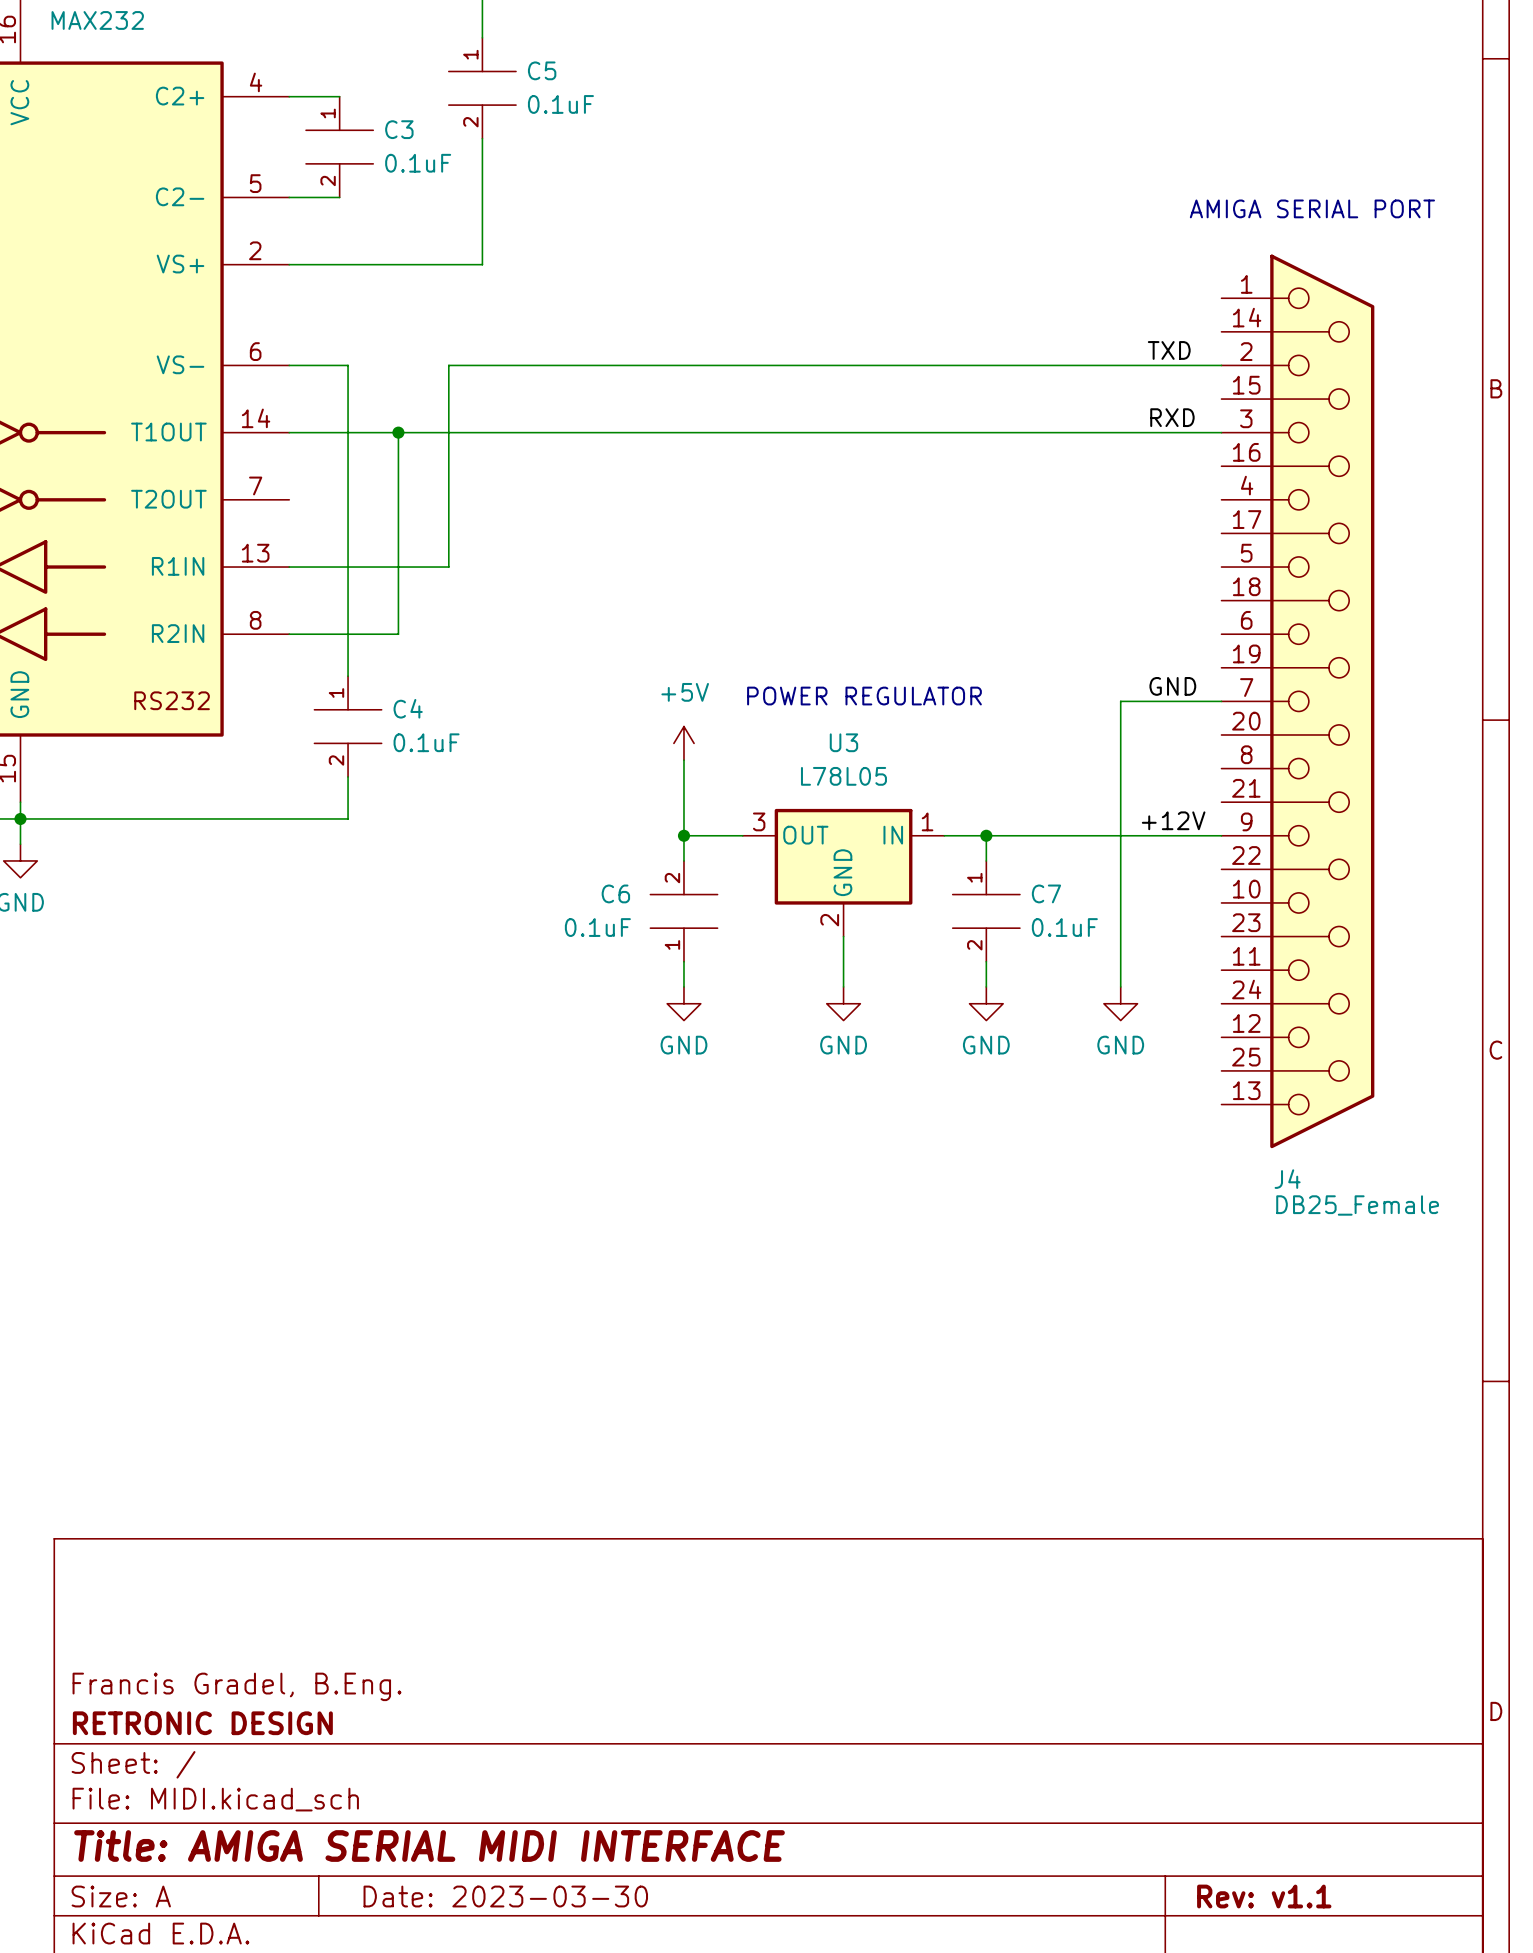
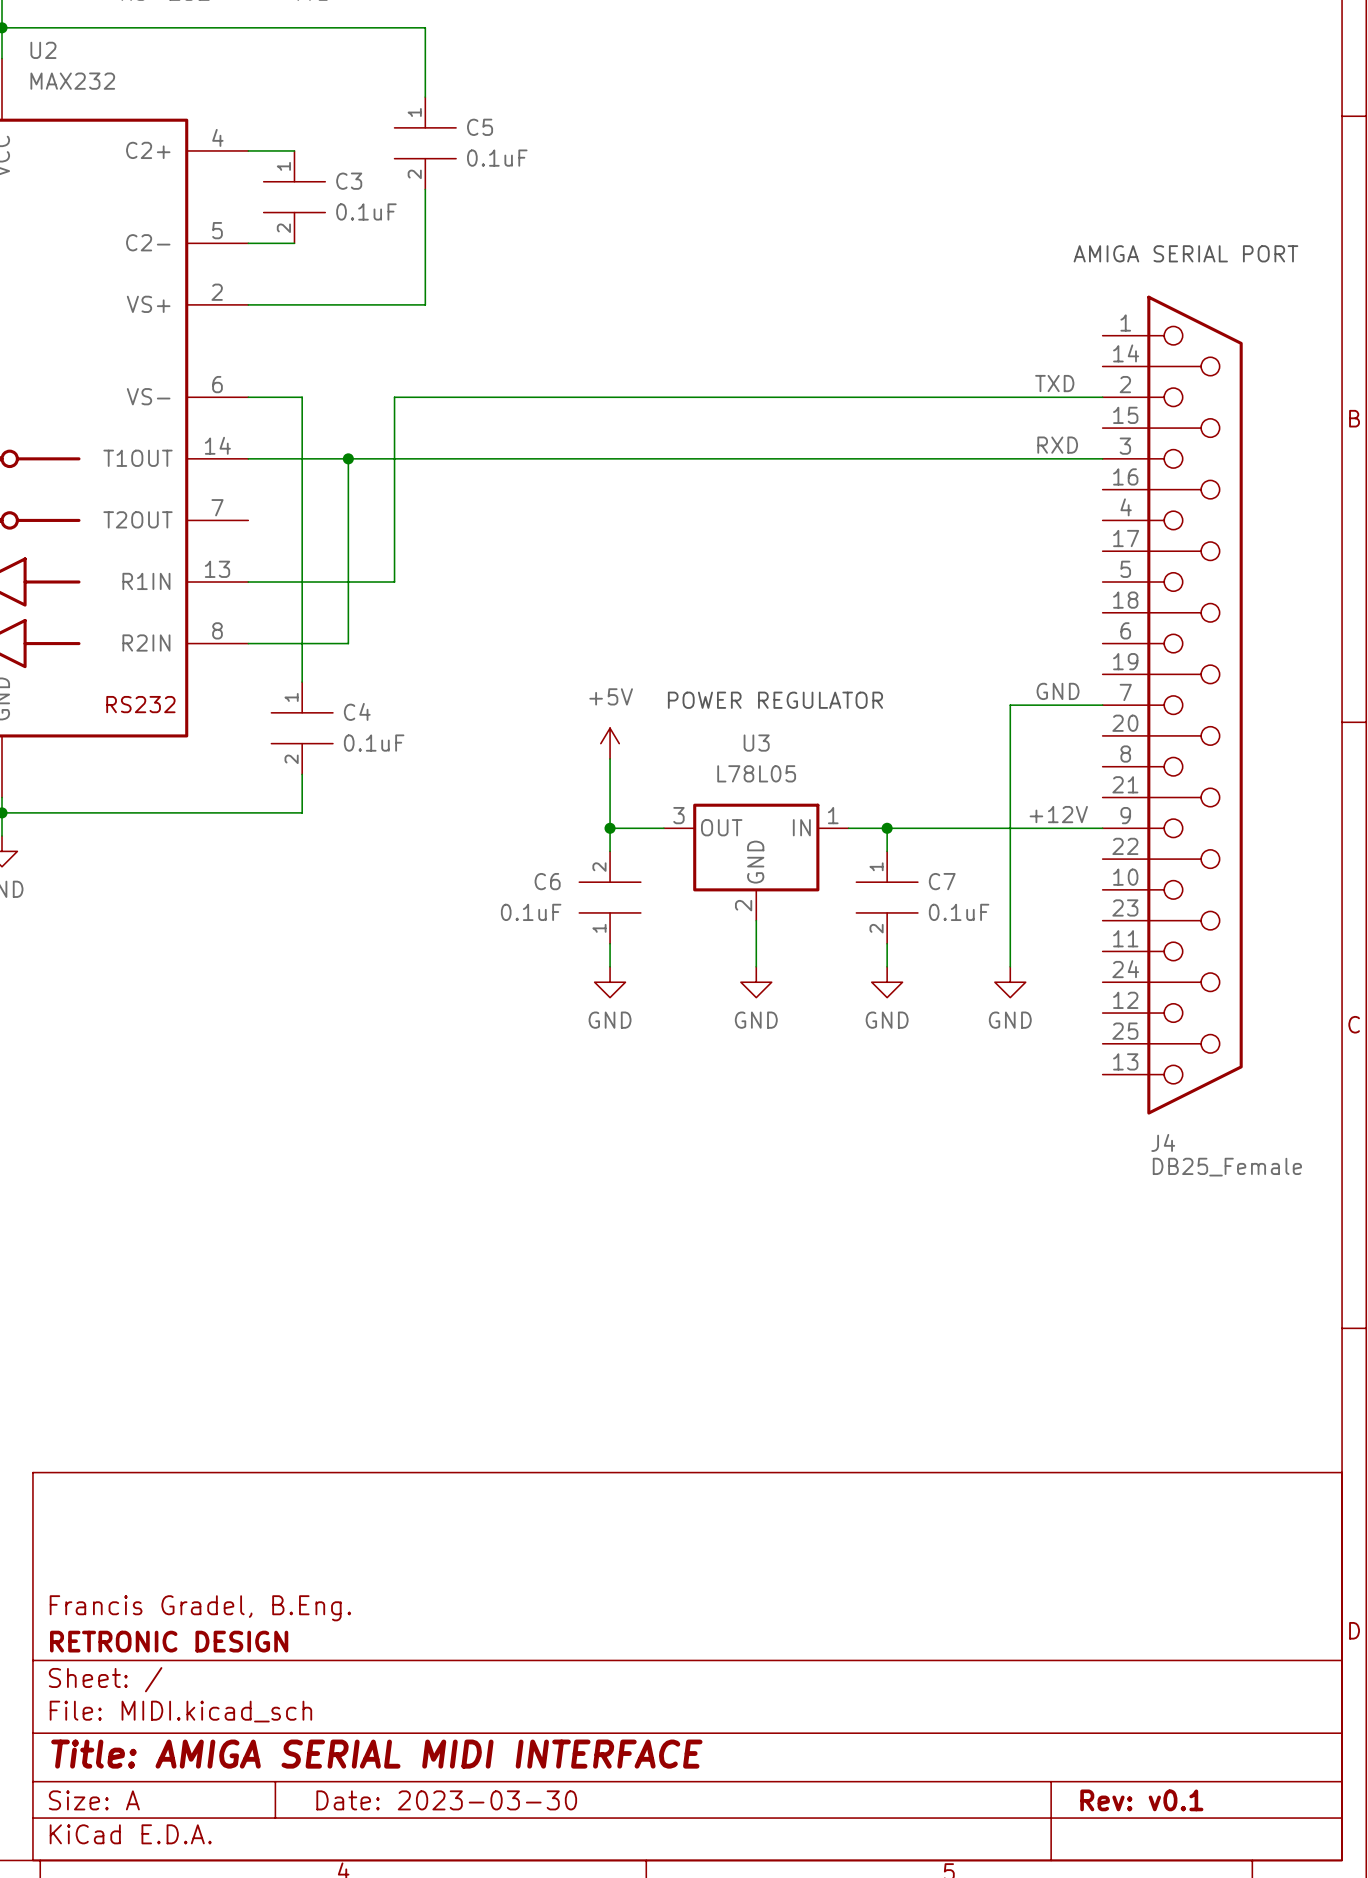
title block: Rev: v1.1 (1264, 1896) -> Rev: v0.1 (1141, 1800)

